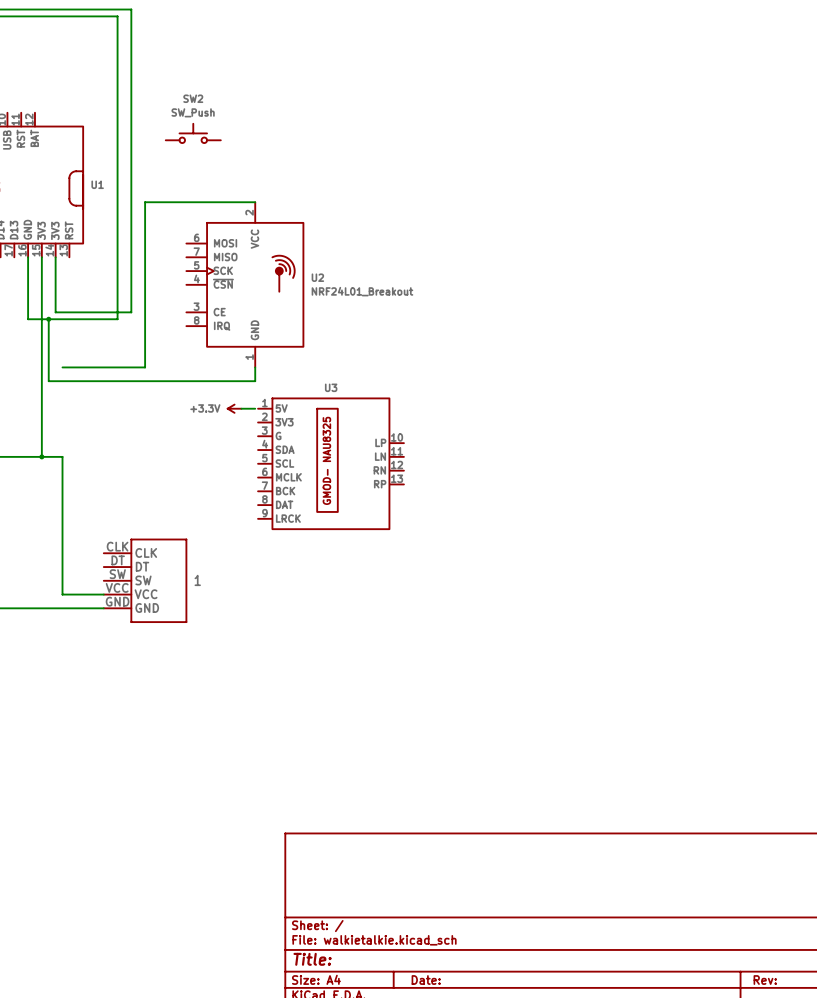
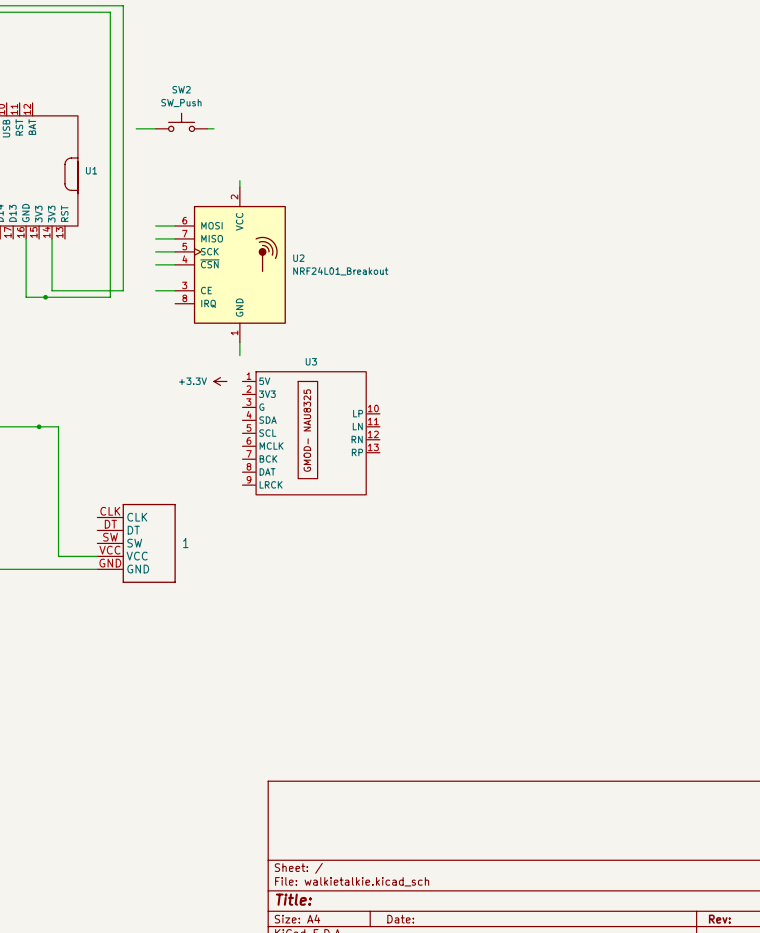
wire: none -> (136, 128) (155, 128)
wire: none -> (207, 128) (213, 128)
wire: (255, 202) (145, 202) (145, 367) (62, 367) -> (239, 187) (239, 180)
wire: none -> (155, 226) (175, 226)
wire: (41, 257) (41, 456) -> none
wire: none -> (155, 238) (175, 238)
wire: none -> (155, 251) (175, 251)
wire: none -> (155, 264) (175, 264)
wire: none -> (155, 290) (175, 290)
wire: (48, 319) (48, 381) (255, 381) -> none
wire: (241, 408) (255, 408) -> none

